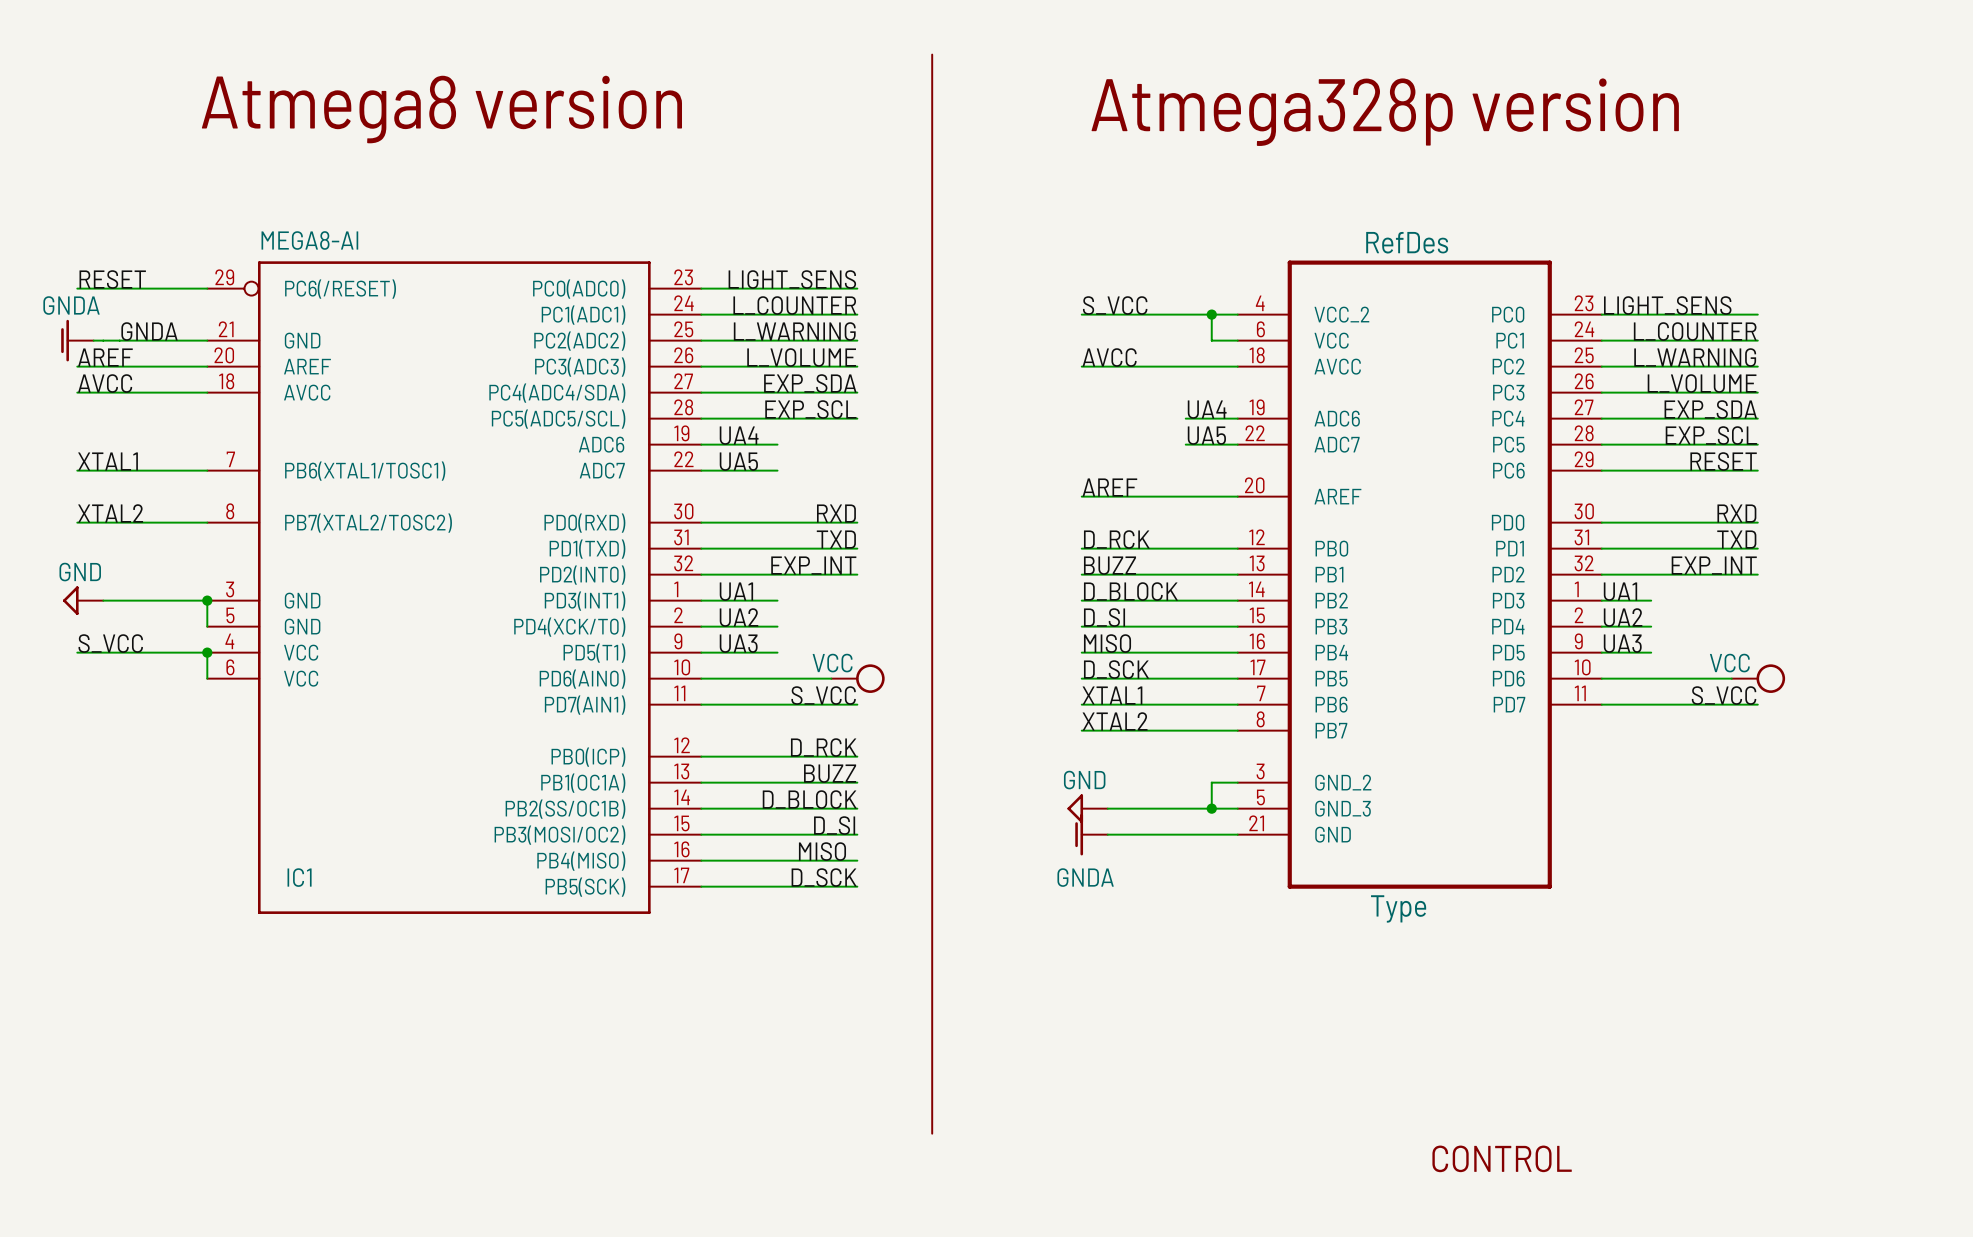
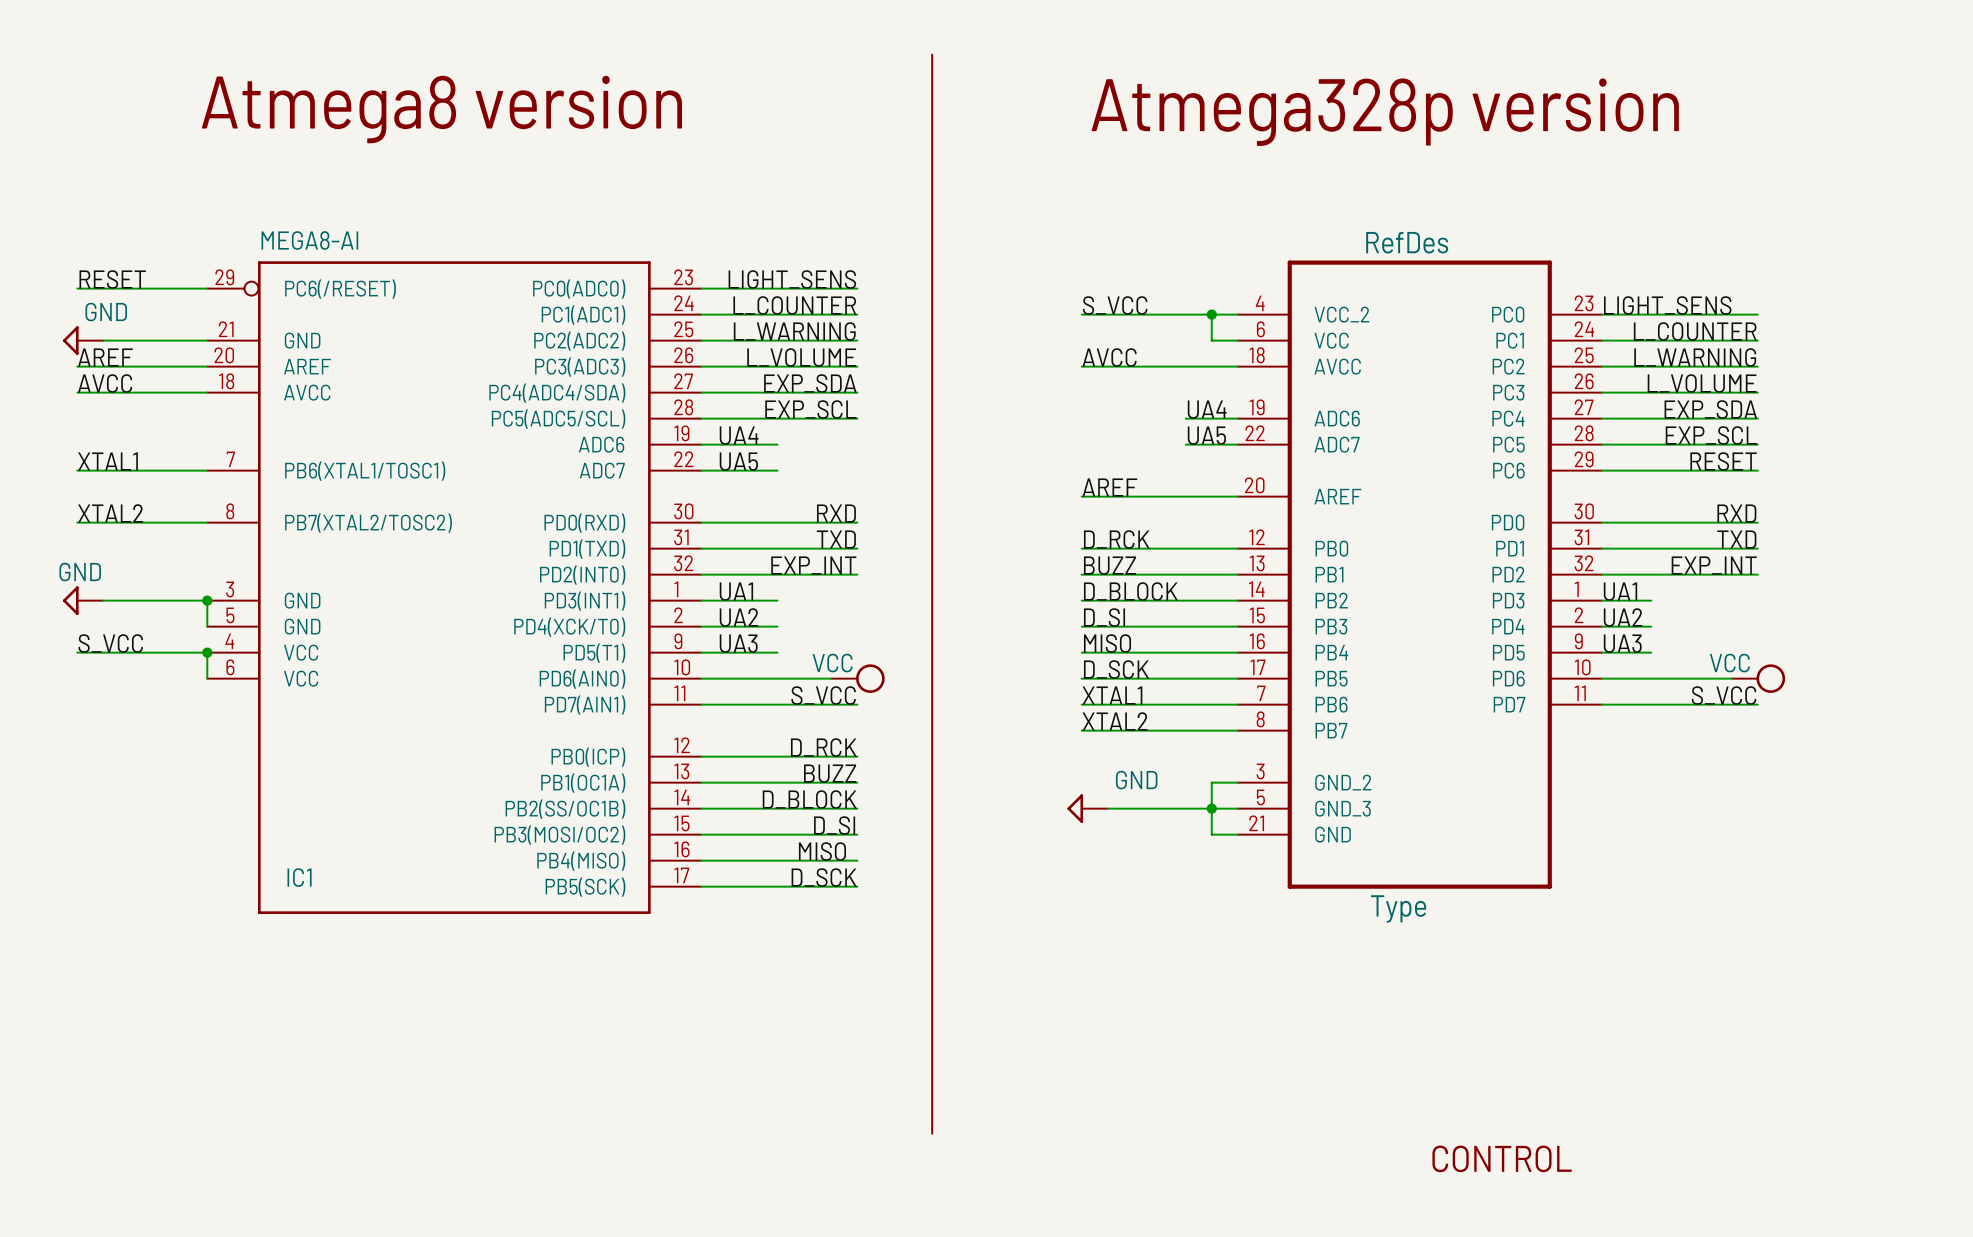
label: GNDA (149, 331) -> none
power symbol: GNDA (77, 340) -> GND (83, 340)
power symbol text position: GND (1084, 780) -> GND (1136, 780)
power symbol: GNDA (1091, 834) -> none
wire: (1107, 834) (1211, 834) -> (1211, 808) (1211, 834)

